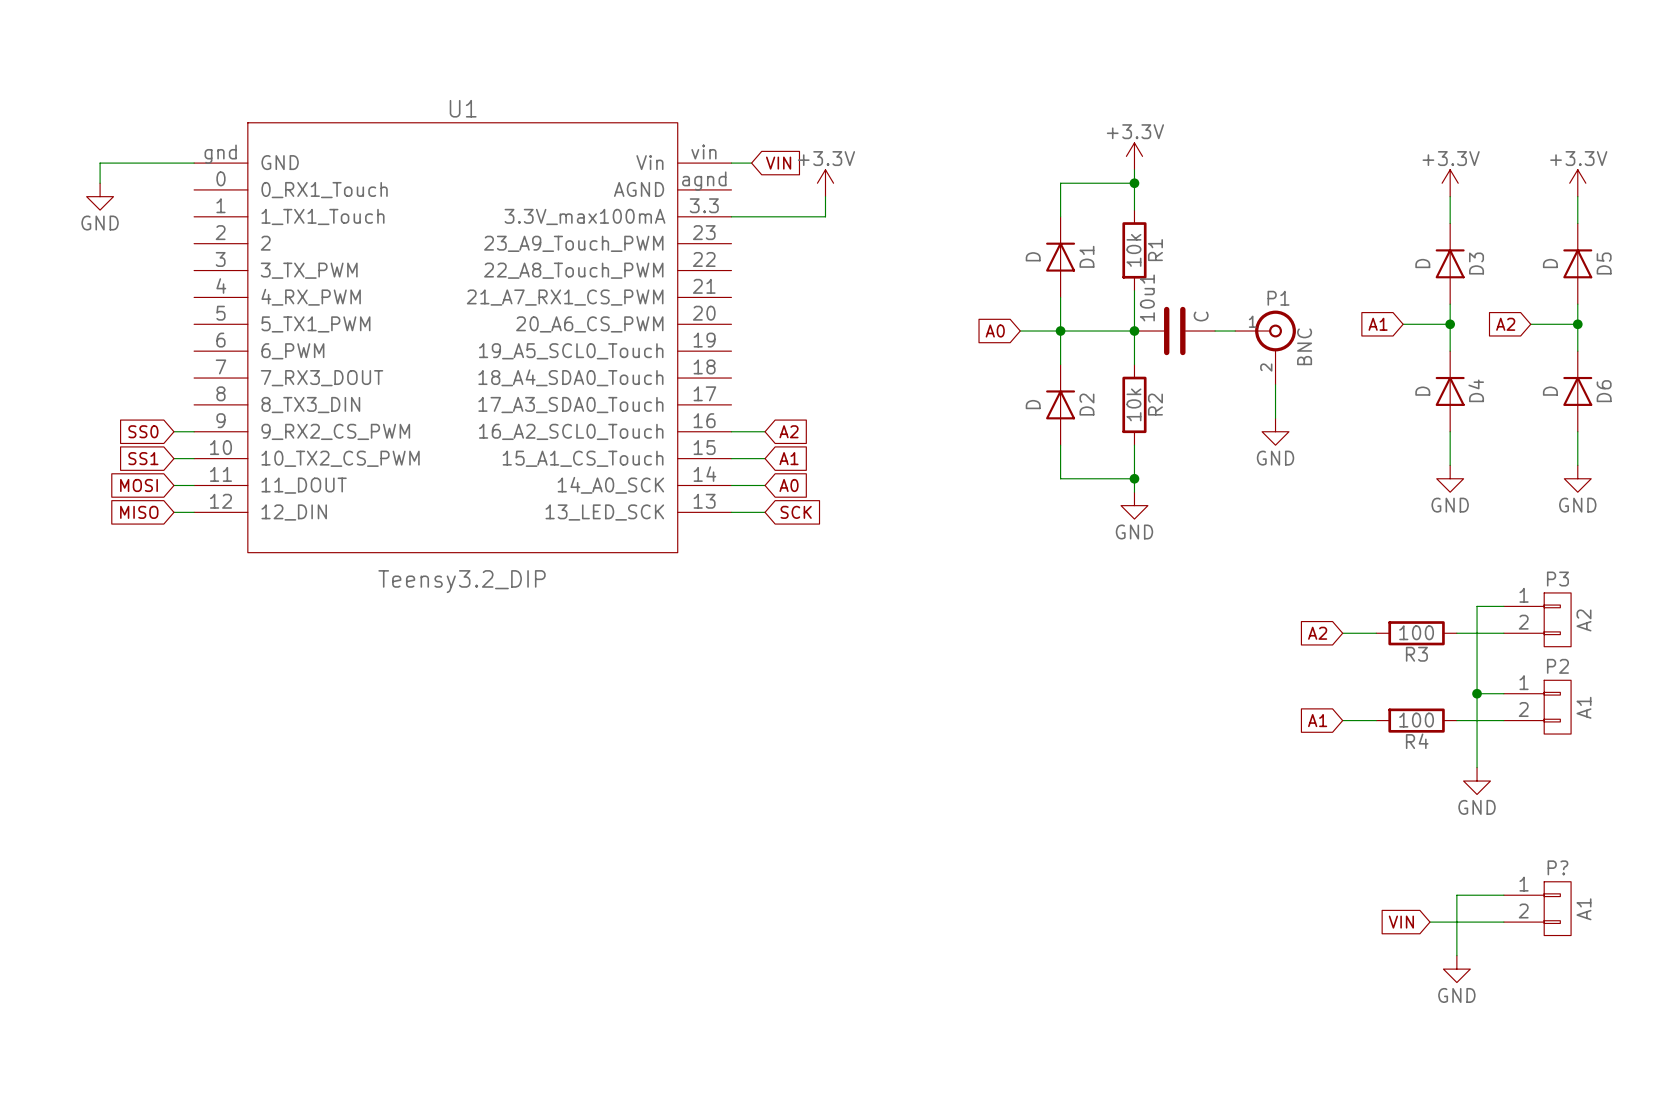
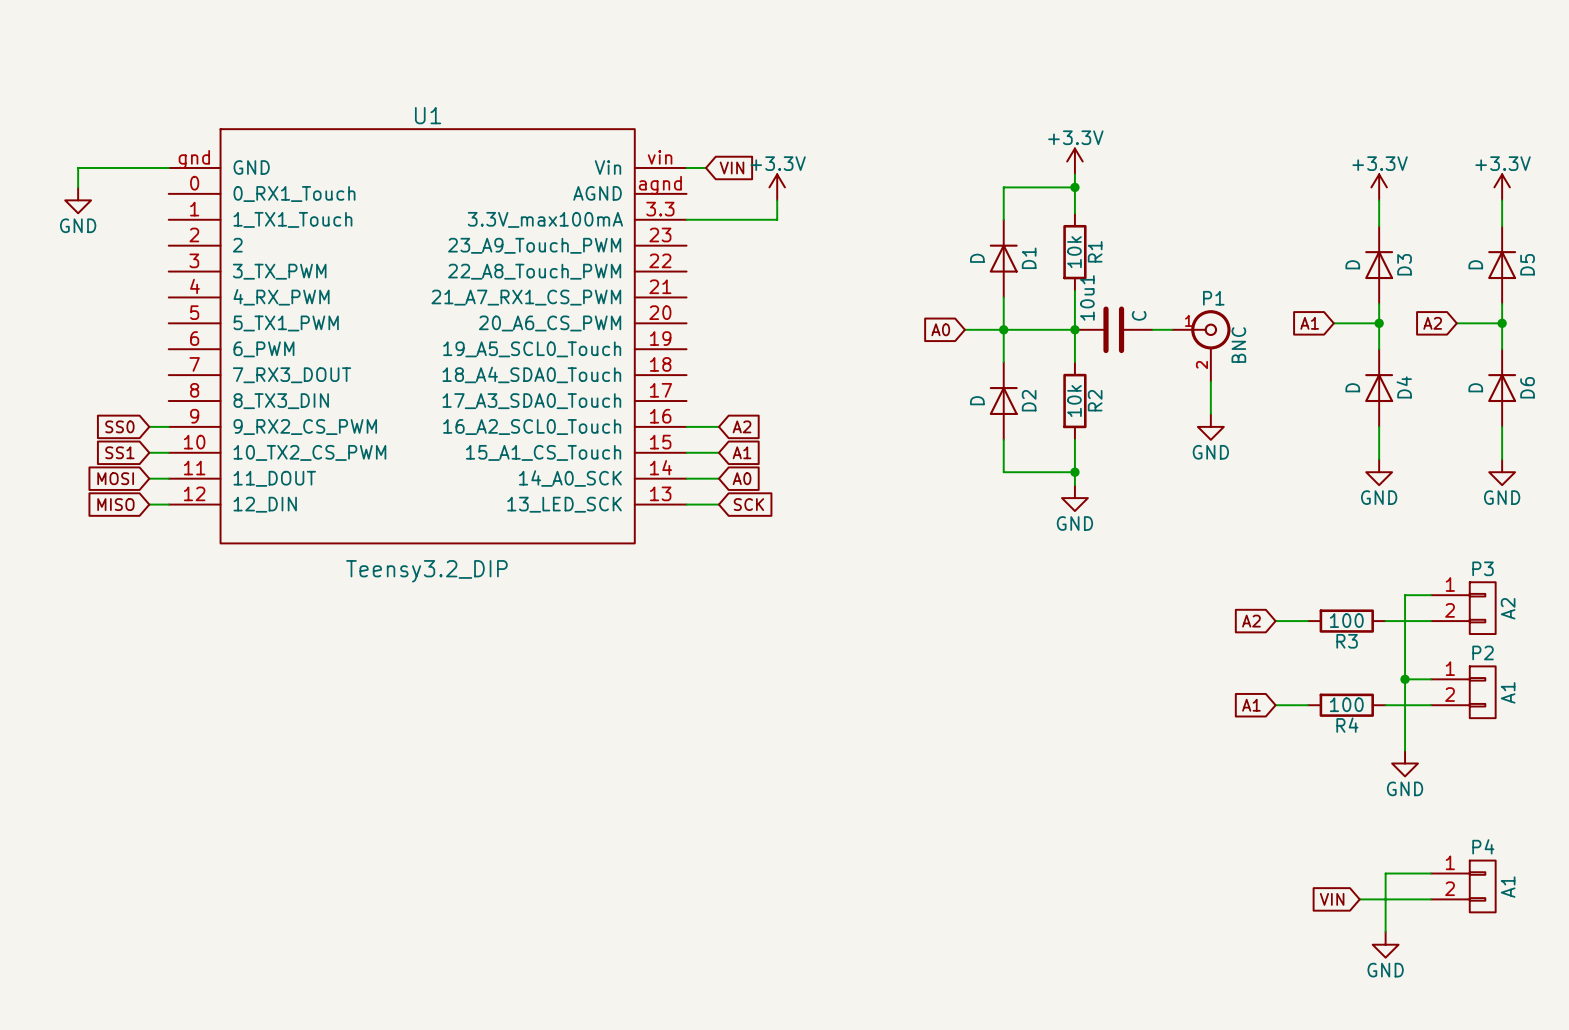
P? name: P? (1557, 867) -> P4 (1483, 846)

